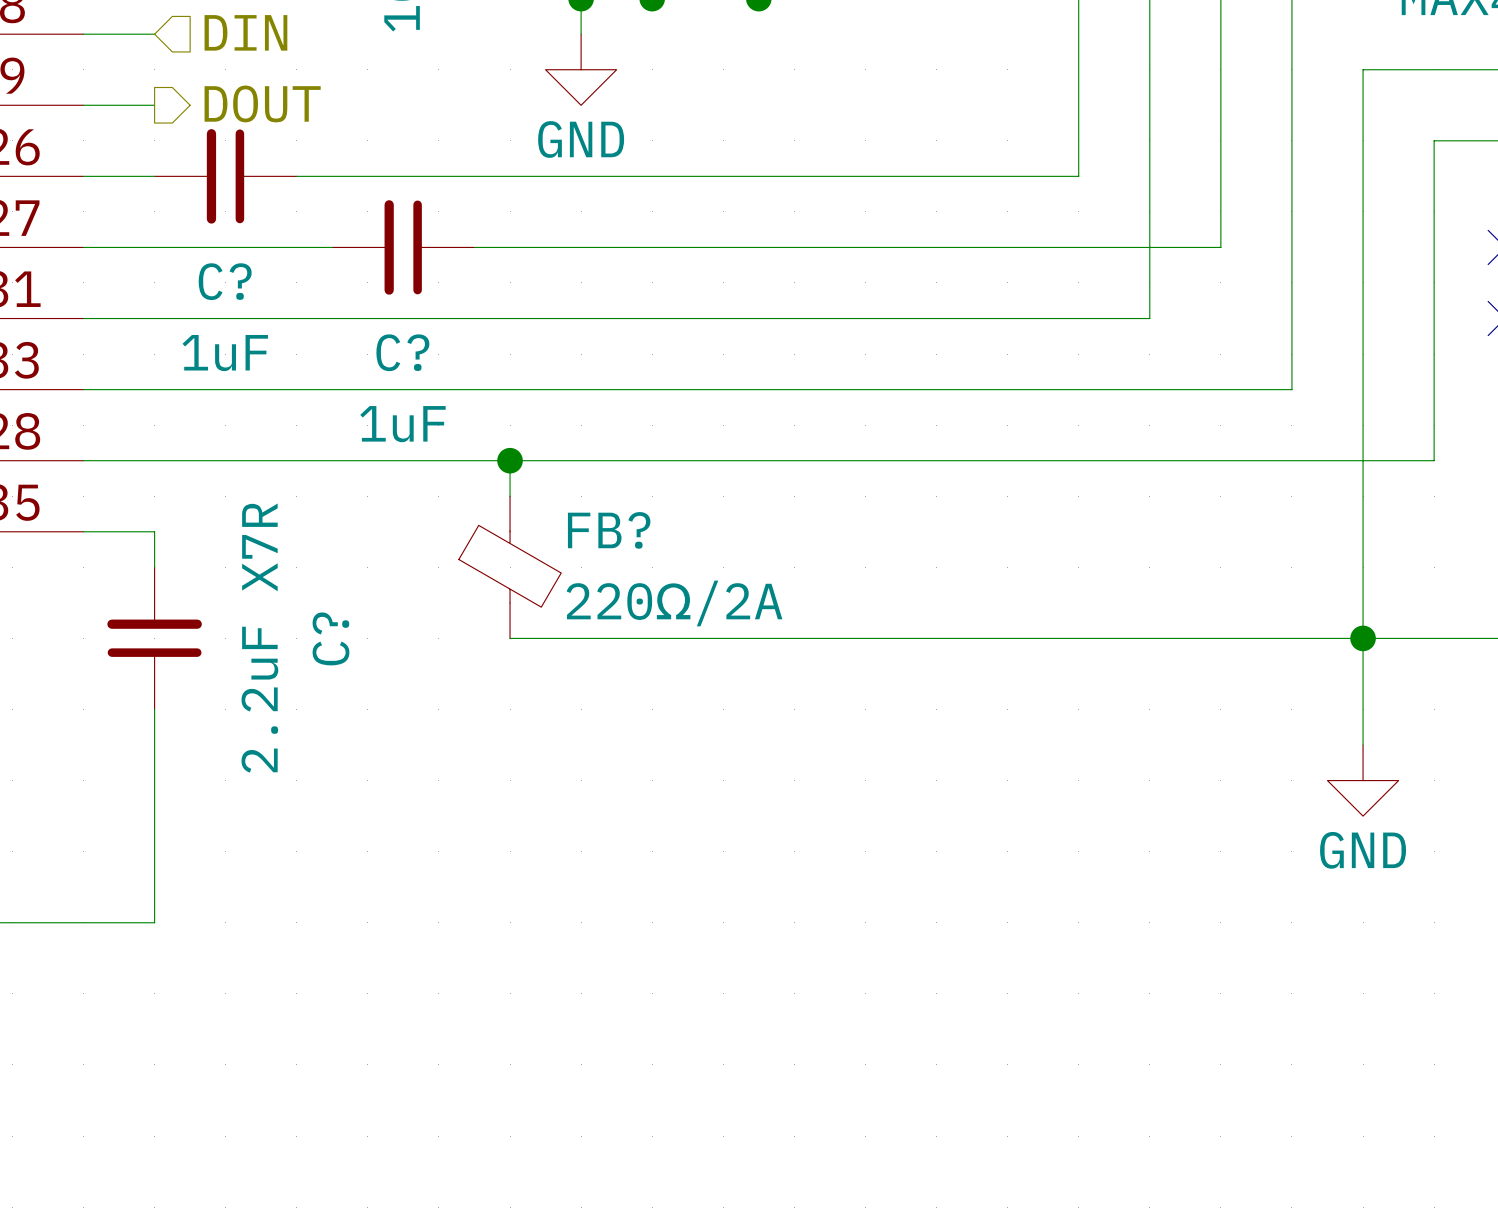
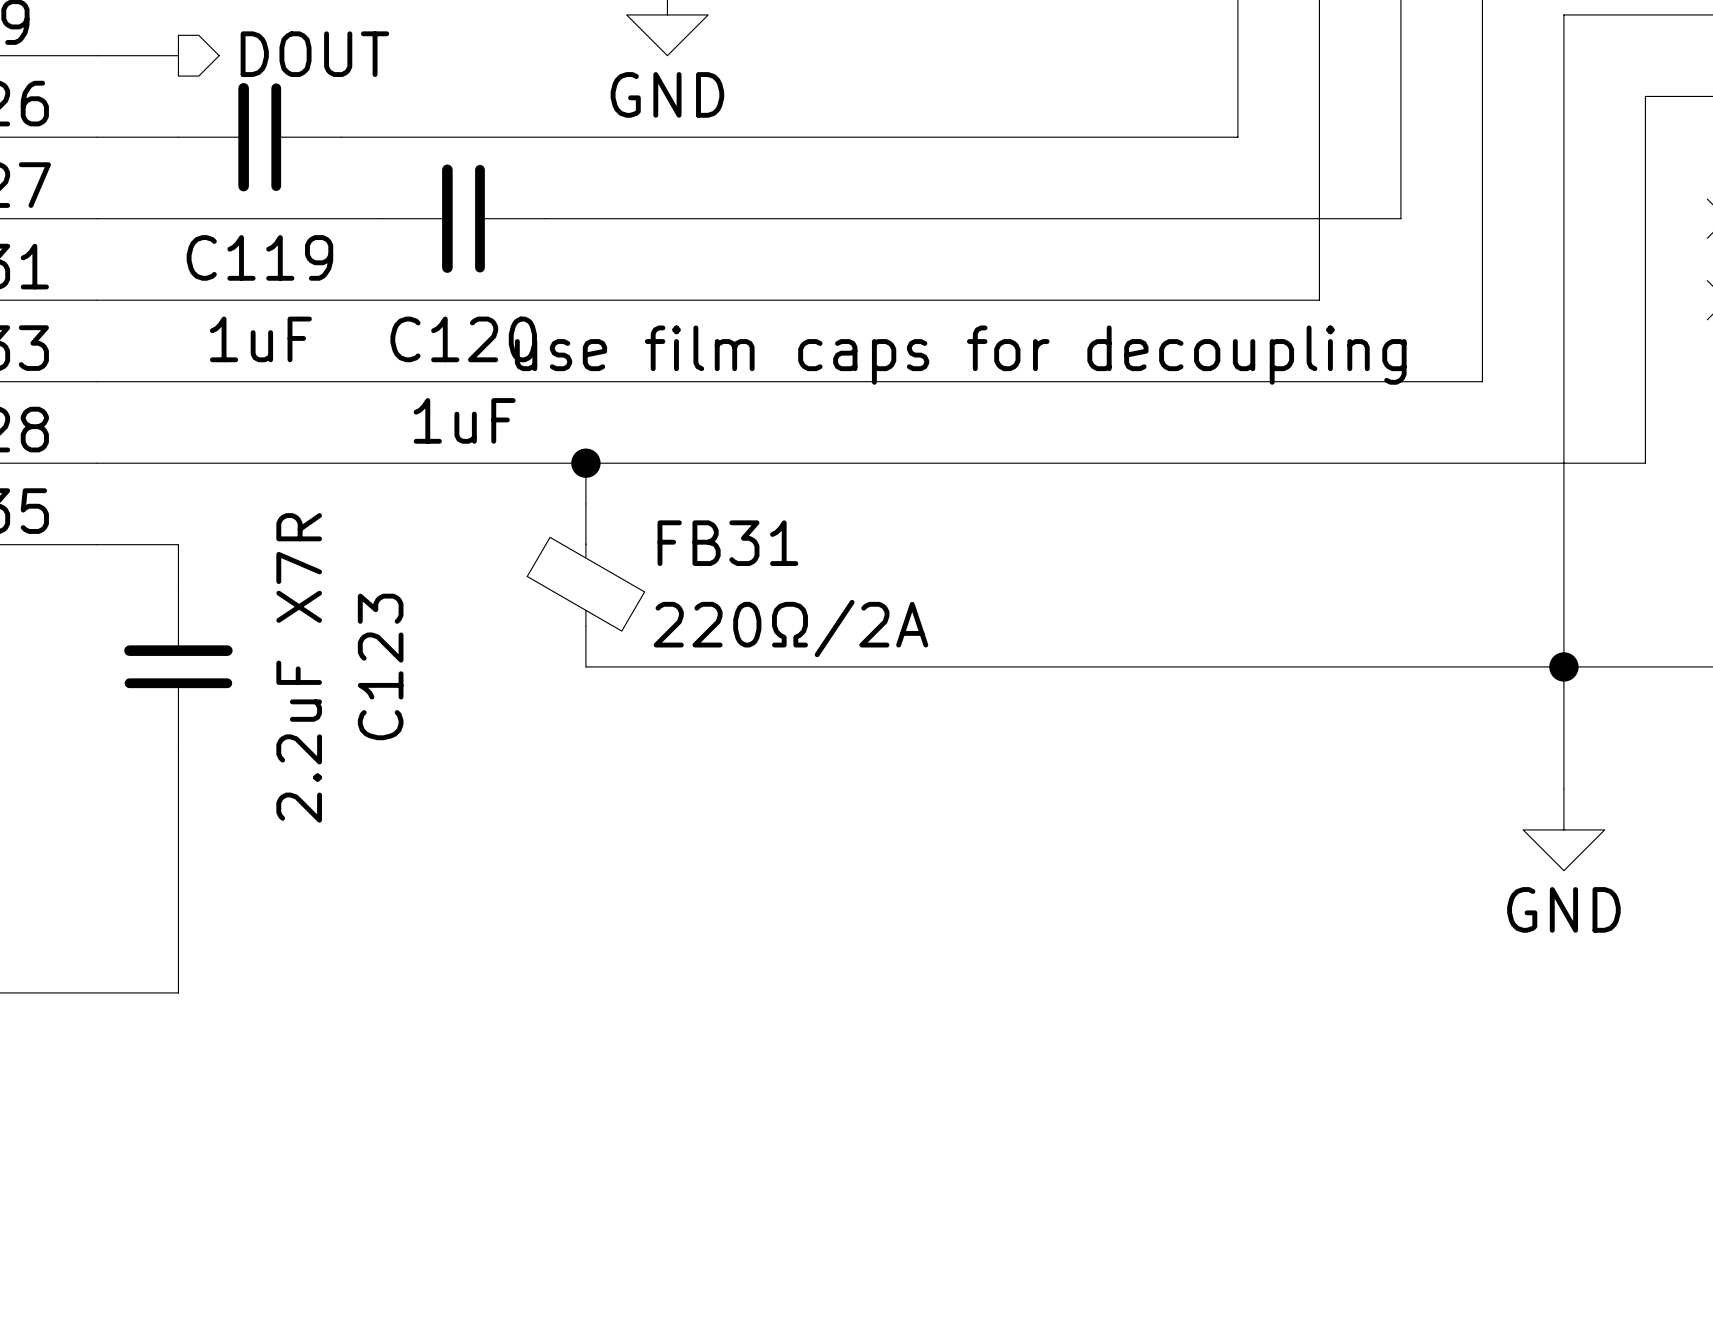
C? name: C? (225, 281) -> C119 (259, 257)
C? name: C? (402, 352) -> C120 (463, 339)
text: none -> use film caps for decoupling (960, 355)
FB? name: FB? (609, 530) -> FB31 (727, 543)
C? name: C? (330, 638) -> C123 (380, 666)

